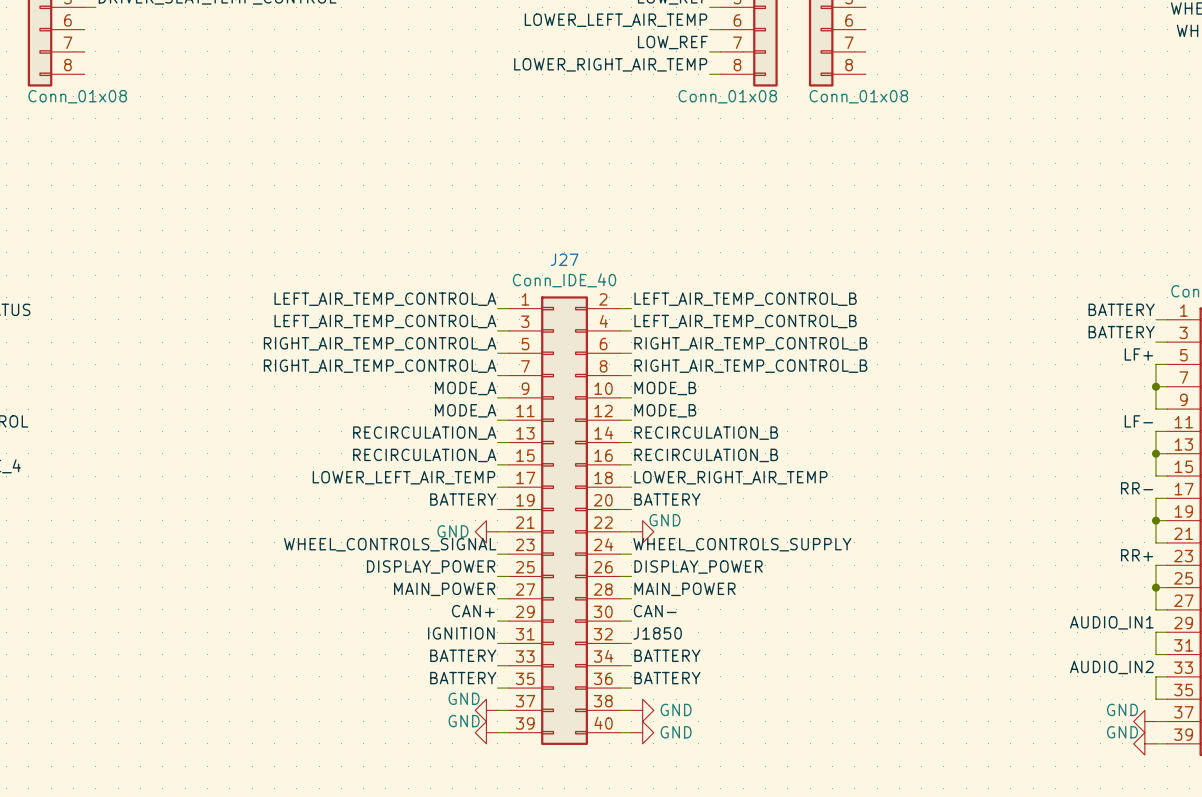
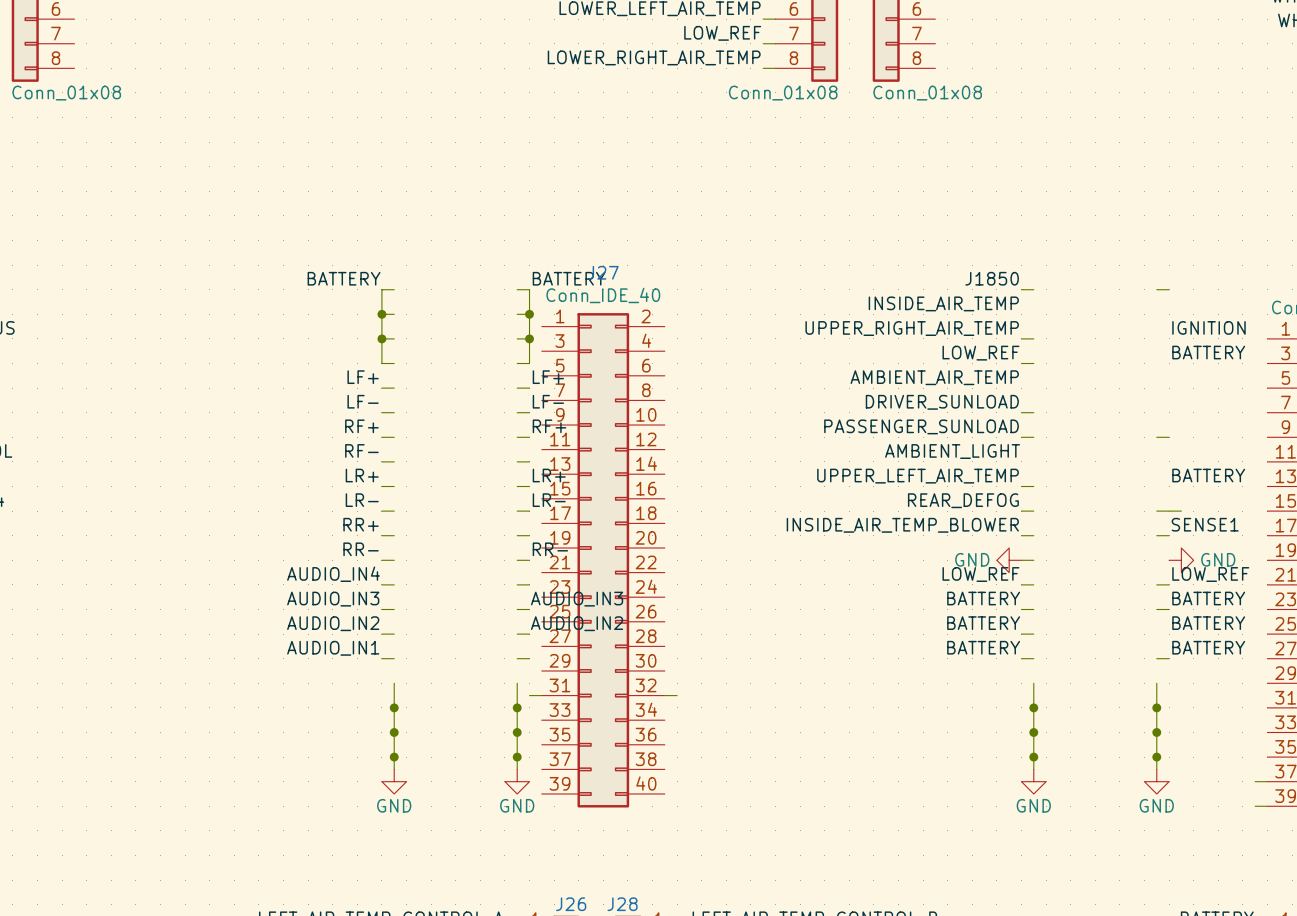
label: none -> BATTERY (344, 278)
label: none -> BATTERY (569, 278)
label: none -> J1850 (992, 278)
wire: none -> (394, 289) (381, 289) (381, 363) (394, 363)
wire: none -> (517, 289) (529, 289) (529, 363) (517, 363)
wire: none -> (1021, 289) (1033, 289)
wire: none -> (1156, 289) (1169, 289)
label: none -> INSIDE_AIR_TEMP (943, 303)
junction: none -> (381, 314)
junction: none -> (529, 314)
label: LEFT_AIR_TEMP_CONTROL_A (385, 299) -> none
label: LEFT_AIR_TEMP_CONTROL_B (745, 299) -> none
wire: (497, 308) (508, 308) -> (381, 314) (394, 314)
wire: (620, 308) (631, 308) -> (517, 314) (529, 314)
label: none -> IGNITION (1208, 327)
label: BATTERY (1121, 309) -> none
label: none -> UPPER_RIGHT_AIR_TEMP (912, 328)
junction: none -> (381, 338)
junction: none -> (529, 338)
wire: (1155, 319) (1167, 319) -> (1021, 338) (1033, 338)
label: LEFT_AIR_TEMP_CONTROL_A (385, 321) -> none
label: LEFT_AIR_TEMP_CONTROL_B (745, 321) -> none
wire: (497, 330) (508, 330) -> (381, 338) (394, 338)
wire: (620, 330) (631, 330) -> (517, 338) (529, 338)
label: none -> LOW_REF (980, 353)
label: none -> BATTERY (1208, 352)
label: BATTERY (1121, 332) -> none
wire: (1155, 342) (1167, 342) -> (1021, 363) (1033, 363)
label: RIGHT_AIR_TEMP_CONTROL_A (380, 343) -> none
label: RIGHT_AIR_TEMP_CONTROL_B (750, 343) -> none
wire: (497, 353) (508, 353) -> none
wire: (620, 353) (631, 353) -> none
label: none -> LF+ (363, 377)
label: none -> LF+ (548, 377)
label: none -> AMBIENT_AIR_TEMP (934, 377)
label: LF+ (1138, 354) -> none
wire: (1167, 364) (1155, 364) (1155, 409) (1167, 409) -> none
label: RIGHT_AIR_TEMP_CONTROL_A (380, 366) -> none
label: RIGHT_AIR_TEMP_CONTROL_B (750, 366) -> none
wire: (497, 375) (508, 375) -> (381, 388) (394, 388)
wire: (620, 375) (631, 375) -> (517, 388) (529, 388)
label: none -> LF- (363, 401)
label: none -> LF- (548, 401)
label: none -> DRIVER_SUNLOAD (942, 402)
wire: (1155, 386) (1167, 386) -> (1021, 412) (1033, 412)
junction: (1155, 386) -> none
label: MODE_A (465, 388) -> none
label: MODE_B (665, 388) -> none
wire: (497, 397) (508, 397) -> (381, 412) (394, 412)
wire: (620, 397) (631, 397) -> (517, 412) (529, 412)
label: none -> RF+ (361, 426)
label: none -> RF+ (549, 426)
label: none -> PASSENGER_SUNLOAD (921, 426)
wire: none -> (1021, 437) (1033, 437)
wire: none -> (1156, 437) (1169, 437)
label: MODE_A (465, 410) -> none
label: MODE_B (665, 410) -> none
wire: (497, 420) (508, 420) -> (381, 437) (394, 437)
wire: (620, 420) (631, 420) -> (517, 437) (529, 437)
label: none -> RF- (361, 450)
label: none -> AMBIENT_LIGHT (952, 451)
label: LF- (1138, 421) -> none
wire: (1167, 431) (1155, 431) (1155, 476) (1167, 476) -> none
label: RECIRCULATION_A (424, 433) -> none
label: RECIRCULATION_B (706, 433) -> none
wire: (497, 442) (508, 442) -> (381, 461) (394, 461)
wire: (620, 442) (631, 442) -> (517, 461) (529, 461)
label: none -> LR+ (362, 475)
label: none -> LR+ (549, 475)
label: none -> BATTERY (1208, 475)
label: none -> UPPER_LEFT_AIR_TEMP (918, 476)
wire: (1155, 453) (1167, 453) -> (1021, 486) (1033, 486)
junction: (1155, 453) -> none
label: RECIRCULATION_A (424, 455) -> none
label: RECIRCULATION_B (706, 455) -> none
wire: (497, 464) (508, 464) -> (381, 486) (394, 486)
wire: (620, 464) (631, 464) -> (517, 486) (529, 486)
label: none -> LR- (362, 500)
label: none -> LR- (549, 500)
label: none -> REAR_DEFOG (963, 500)
wire: none -> (1021, 511) (1033, 511)
wire: none -> (1156, 511) (1181, 511)
label: LOWER_LEFT_AIR_TEMP (403, 477) -> none
label: LOWER_RIGHT_AIR_TEMP (730, 477) -> none
wire: (497, 487) (508, 487) -> (381, 511) (394, 511)
wire: (620, 487) (631, 487) -> (517, 511) (529, 511)
label: none -> RR+ (361, 524)
label: none -> INSIDE_AIR_TEMP_BLOWER (902, 525)
label: none -> SENSE1 (1205, 524)
label: RR- (1137, 488) -> none
wire: none -> (1021, 535) (1033, 535)
wire: none -> (1156, 535) (1169, 535)
wire: (1167, 498) (1155, 498) (1155, 542) (1167, 542) -> none
label: BATTERY (463, 499) -> none
label: BATTERY (667, 499) -> none
wire: (497, 509) (508, 509) -> (381, 535) (394, 535)
wire: (620, 509) (631, 509) -> (517, 535) (529, 535)
label: none -> RR- (361, 549)
label: none -> RR- (550, 549)
power symbol: none -> GND (1009, 560)
power symbol: none -> GND (1181, 560)
wire: (1155, 520) (1167, 520) -> (1021, 560) (1033, 560)
junction: (1155, 520) -> none
power symbol: GND (486, 531) -> none
wire: (497, 531) (508, 531) -> (381, 560) (394, 560)
wire: (620, 531) (631, 531) -> (517, 560) (529, 560)
power symbol: GND (642, 531) -> none
label: none -> AUDIO_IN4 (333, 574)
label: none -> LOW_REF (980, 574)
label: none -> LOW_REF (1210, 574)
wire: none -> (1021, 584) (1033, 584)
wire: none -> (1156, 584) (1169, 584)
label: WHEEL_CONTROLS_SIGNAL (390, 544) -> none
label: WHEEL_CONTROLS_SUPPLY (742, 544) -> none
wire: (497, 554) (508, 554) -> (381, 584) (394, 584)
wire: (620, 554) (631, 554) -> (517, 584) (529, 584)
label: none -> AUDIO_IN3 (333, 599)
label: none -> AUDIO_IN3 (577, 599)
label: none -> BATTERY (983, 598)
label: none -> BATTERY (1208, 598)
label: RR+ (1137, 555) -> none
wire: none -> (1021, 609) (1033, 609)
wire: none -> (1156, 609) (1169, 609)
wire: (1167, 565) (1155, 565) (1155, 609) (1167, 609) -> none
label: DISPLAY_POWER (431, 567) -> none
label: DISPLAY_POWER (698, 567) -> none
wire: (497, 576) (508, 576) -> (381, 609) (394, 609)
wire: (620, 576) (631, 576) -> (517, 609) (529, 609)
label: none -> BATTERY (983, 623)
label: none -> BATTERY (1208, 623)
label: none -> AUDIO_IN2 (333, 623)
label: none -> AUDIO_IN2 (577, 623)
wire: (1155, 587) (1167, 587) -> (1021, 634) (1033, 634)
junction: (1155, 587) -> none
label: MAIN_POWER (444, 589) -> none
label: MAIN_POWER (684, 589) -> none
wire: (497, 598) (508, 598) -> (381, 634) (394, 634)
wire: (620, 598) (631, 598) -> (517, 634) (529, 634)
label: none -> BATTERY (983, 647)
label: none -> BATTERY (1208, 647)
label: none -> AUDIO_IN1 (333, 648)
wire: none -> (1021, 658) (1033, 658)
wire: none -> (1156, 658) (1169, 658)
label: CAN+ (473, 611) -> none
label: CAN- (655, 611) -> none
wire: (497, 621) (508, 621) -> (381, 658) (394, 658)
wire: (620, 621) (631, 621) -> (517, 658) (529, 658)
label: AUDIO_IN1 (1111, 622) -> none
wire: none -> (394, 683) (394, 769)
wire: none -> (517, 683) (517, 769)
wire: none -> (1033, 683) (1033, 769)
wire: none -> (1156, 683) (1156, 769)
wire: (1167, 632) (1155, 632) (1155, 654) (1167, 654) -> none
label: IGNITION (461, 633) -> none
label: J1850 (657, 633) -> none
junction: none -> (394, 707)
junction: none -> (517, 707)
junction: none -> (1033, 707)
junction: none -> (1156, 707)
label: BATTERY (463, 655) -> none
label: BATTERY (667, 655) -> none
wire: (497, 665) (508, 665) -> none
wire: (620, 665) (631, 665) -> none
label: AUDIO_IN2 (1111, 667) -> none
junction: none -> (394, 732)
junction: none -> (517, 732)
junction: none -> (1033, 732)
junction: none -> (1156, 732)
wire: (1167, 676) (1155, 676) (1155, 699) (1167, 699) -> none
label: BATTERY (463, 678) -> none
label: BATTERY (667, 678) -> none
wire: (497, 688) (508, 688) -> none
wire: (620, 688) (631, 688) -> none
junction: none -> (394, 757)
junction: none -> (517, 757)
junction: none -> (1033, 757)
junction: none -> (1156, 757)
power symbol: GND (486, 710) -> none
wire: (497, 710) (508, 710) -> none
wire: (620, 710) (631, 710) -> none
power symbol: GND (642, 710) -> none
power symbol: none -> GND (394, 781)
power symbol: none -> GND (517, 781)
power symbol: none -> GND (1033, 781)
power symbol: none -> GND (1156, 781)
power symbol: GND (1144, 721) -> none
power symbol: GND (486, 732) -> none
wire: (497, 732) (508, 732) -> none
wire: (620, 732) (631, 732) -> none
power symbol: GND (642, 732) -> none
power symbol: GND (1144, 743) -> none

